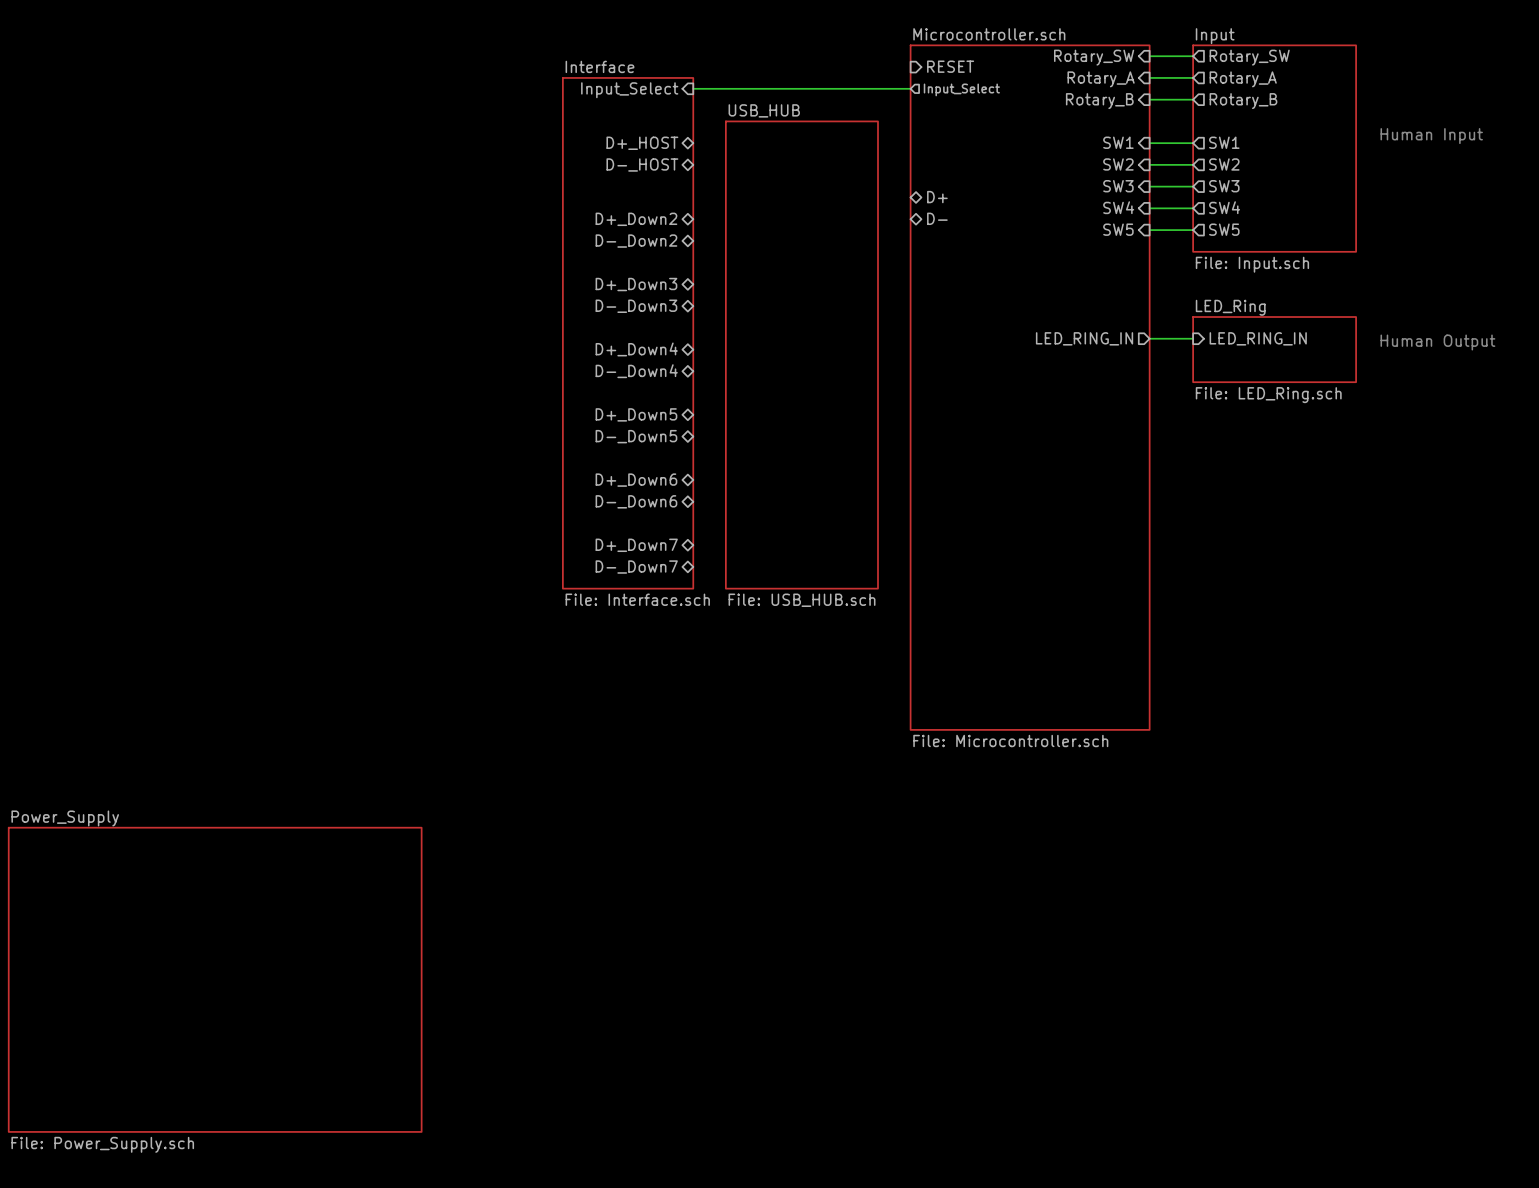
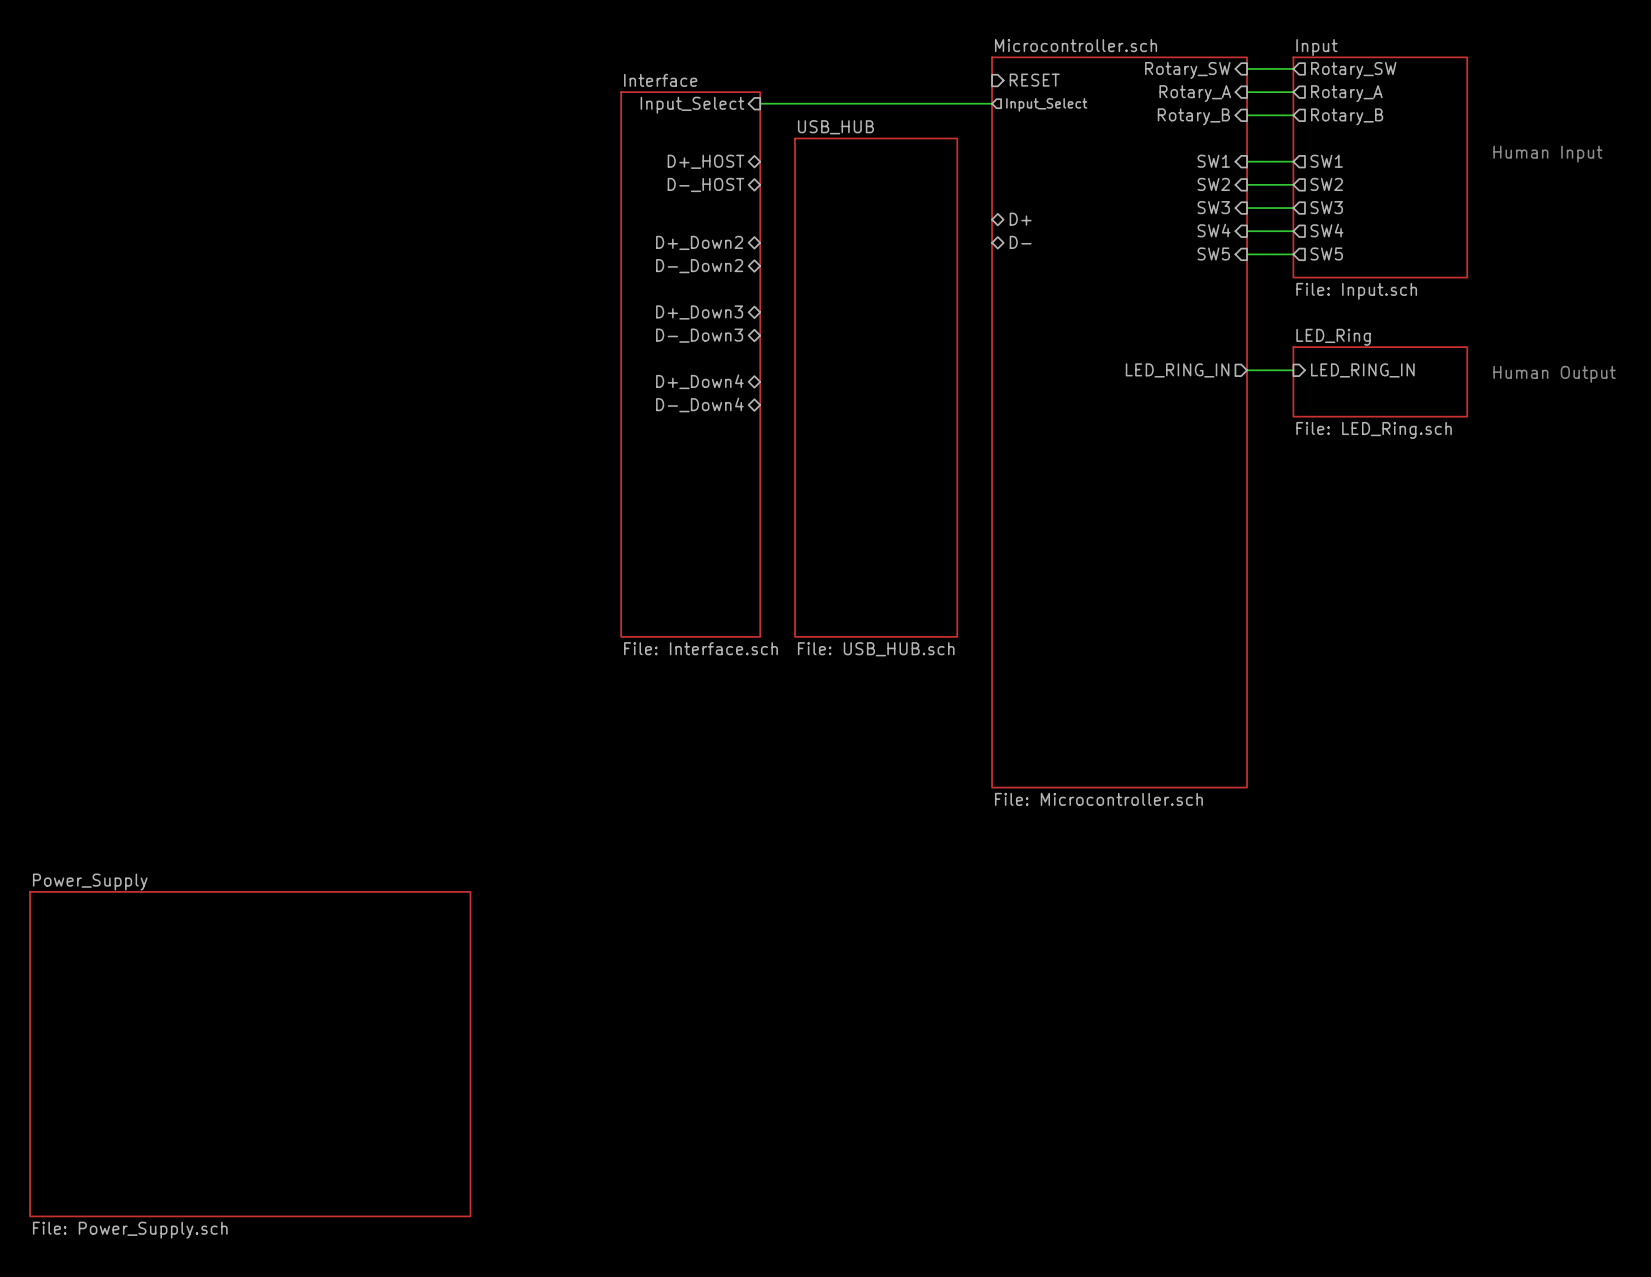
sheet pin: D+_Down5 (636, 414) -> none
sheet pin: D-_Down5 (636, 436) -> none
sheet pin: D+_Down6 (636, 480) -> none
sheet pin: D-_Down6 (636, 501) -> none
sheet pin: D+_Down7 (636, 545) -> none
sheet pin: D-_Down7 (636, 567) -> none

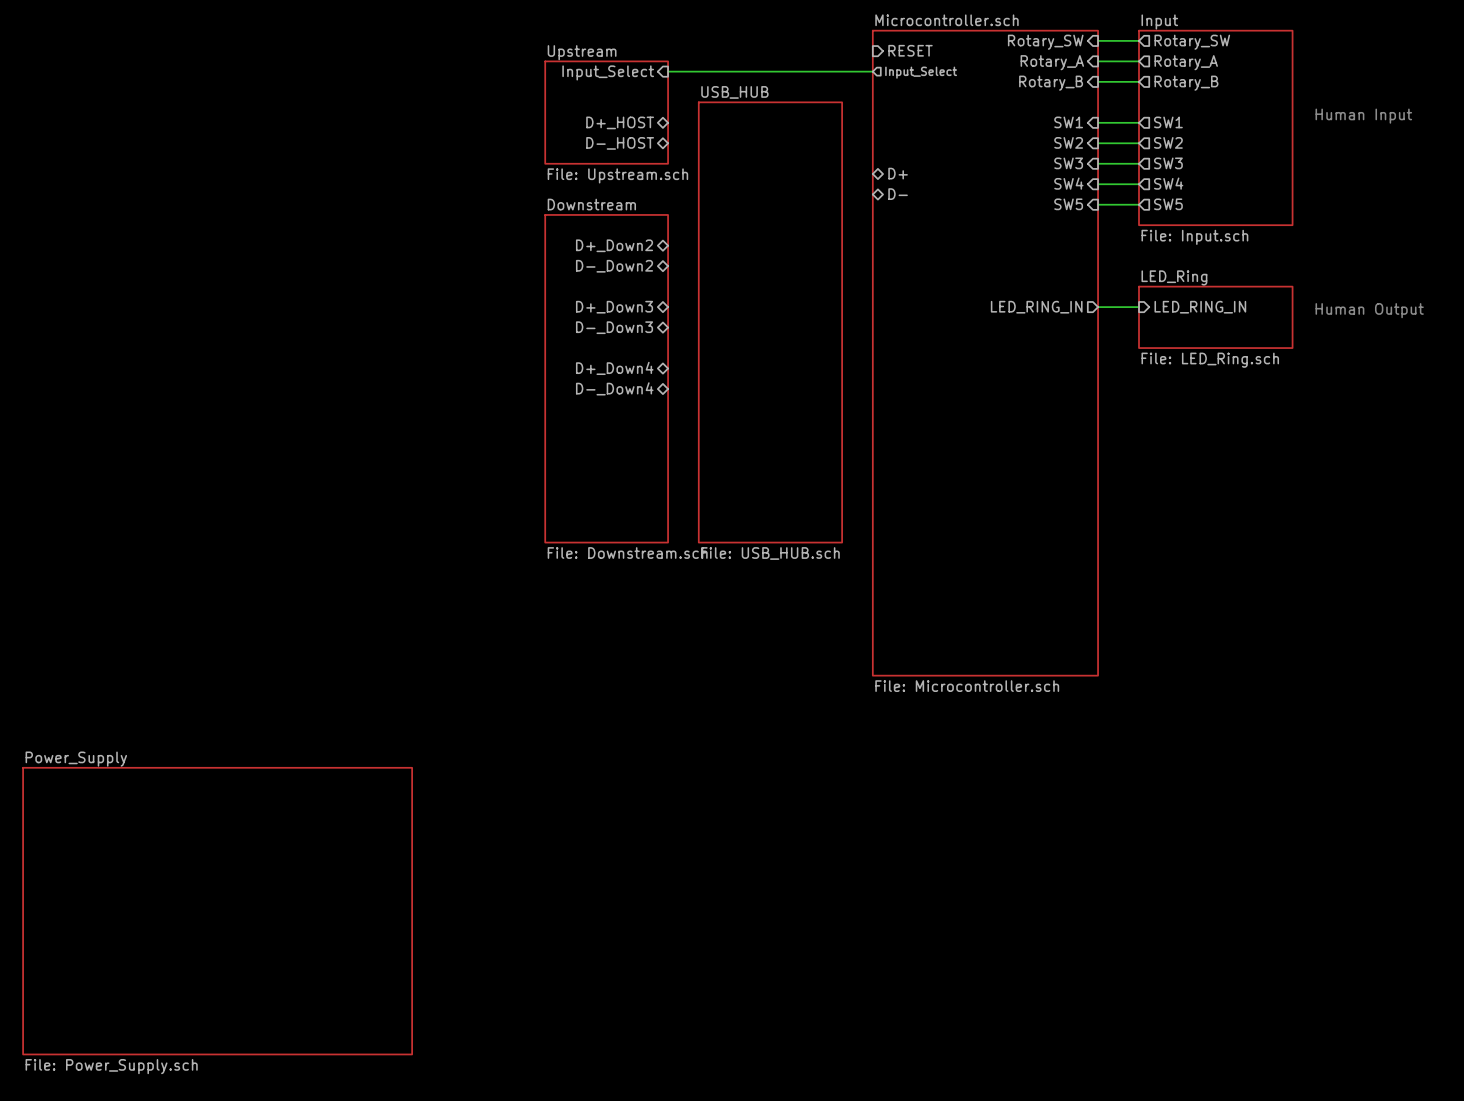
sheet Upstream: none -> File: Upstream.sch (606, 112)
sheet pin position: D+_Down2 (699, 242) -> D+_Down2 (614, 245)
sheet pin position: D-_Down2 (699, 266) -> D-_Down2 (614, 266)
sheet pin position: D+_Down3 (699, 312) -> D+_Down3 (614, 307)
sheet pin position: D-_Down3 (699, 335) -> D-_Down3 (614, 327)
sheet Interface: File: Interface.sch (690, 364) -> none
sheet pin position: D+_Down4 (699, 381) -> D+_Down4 (614, 368)
sheet pin position: D-_Down4 (699, 404) -> D-_Down4 (614, 388)
sheet Downstream: none -> File: Downstream.sch (606, 378)

